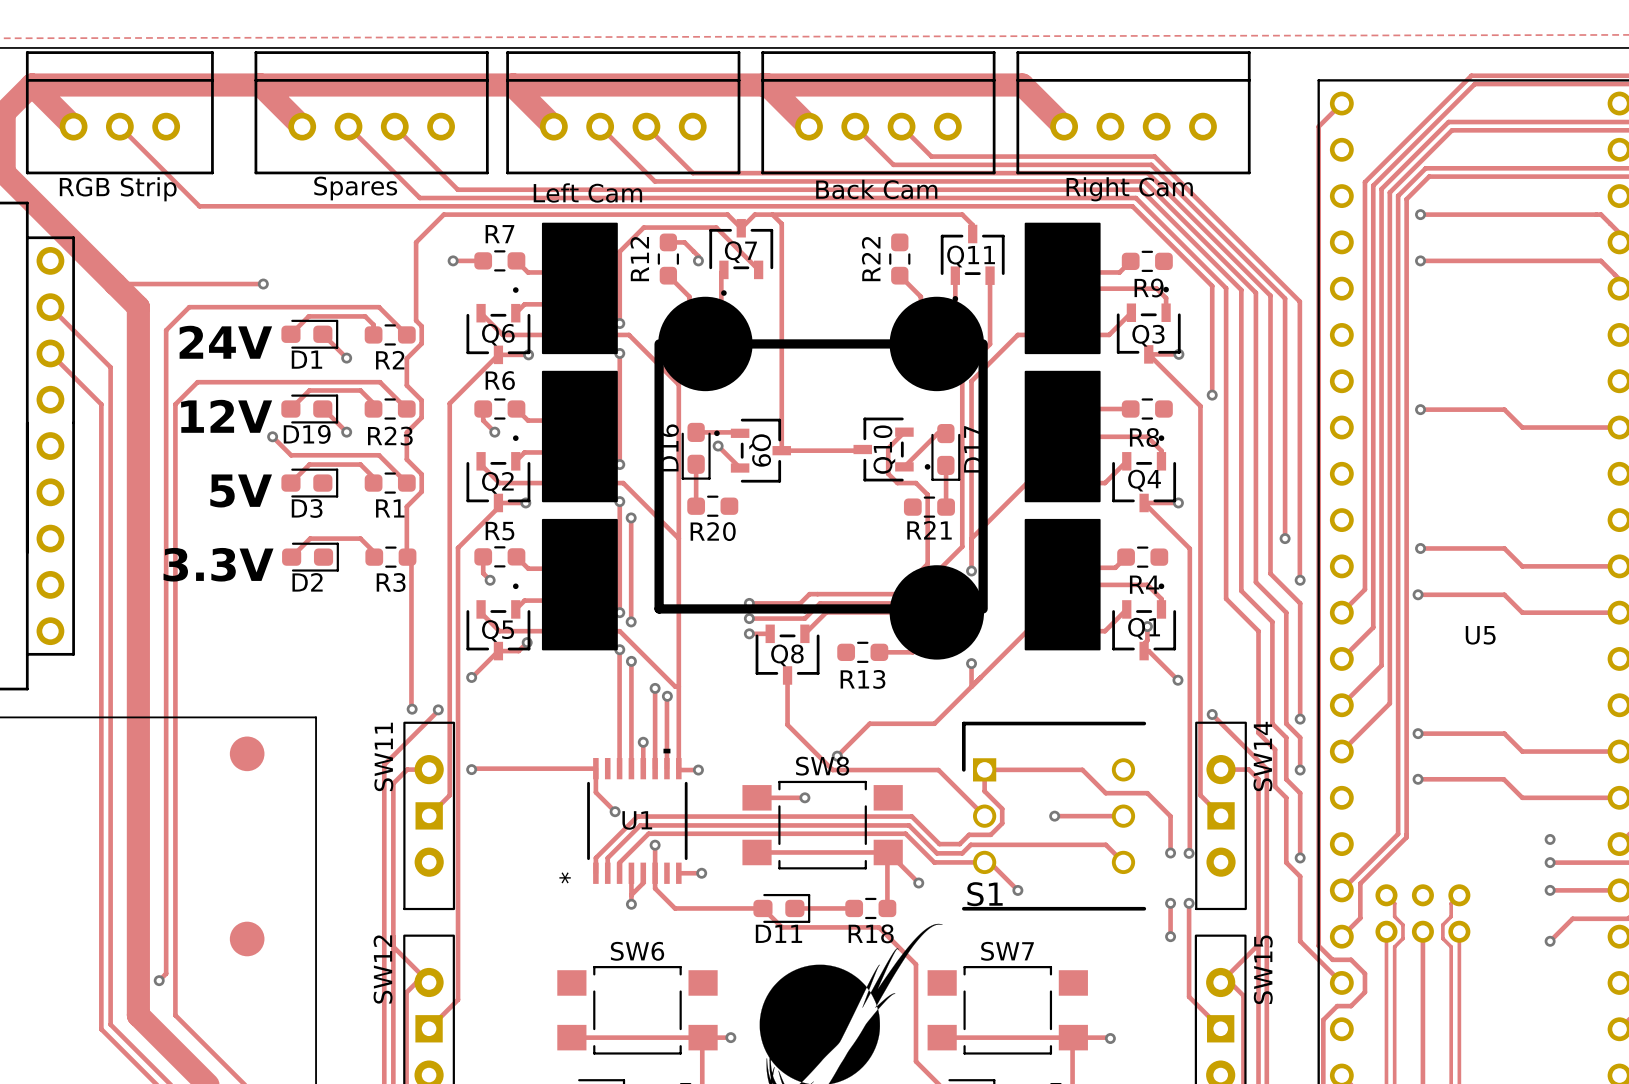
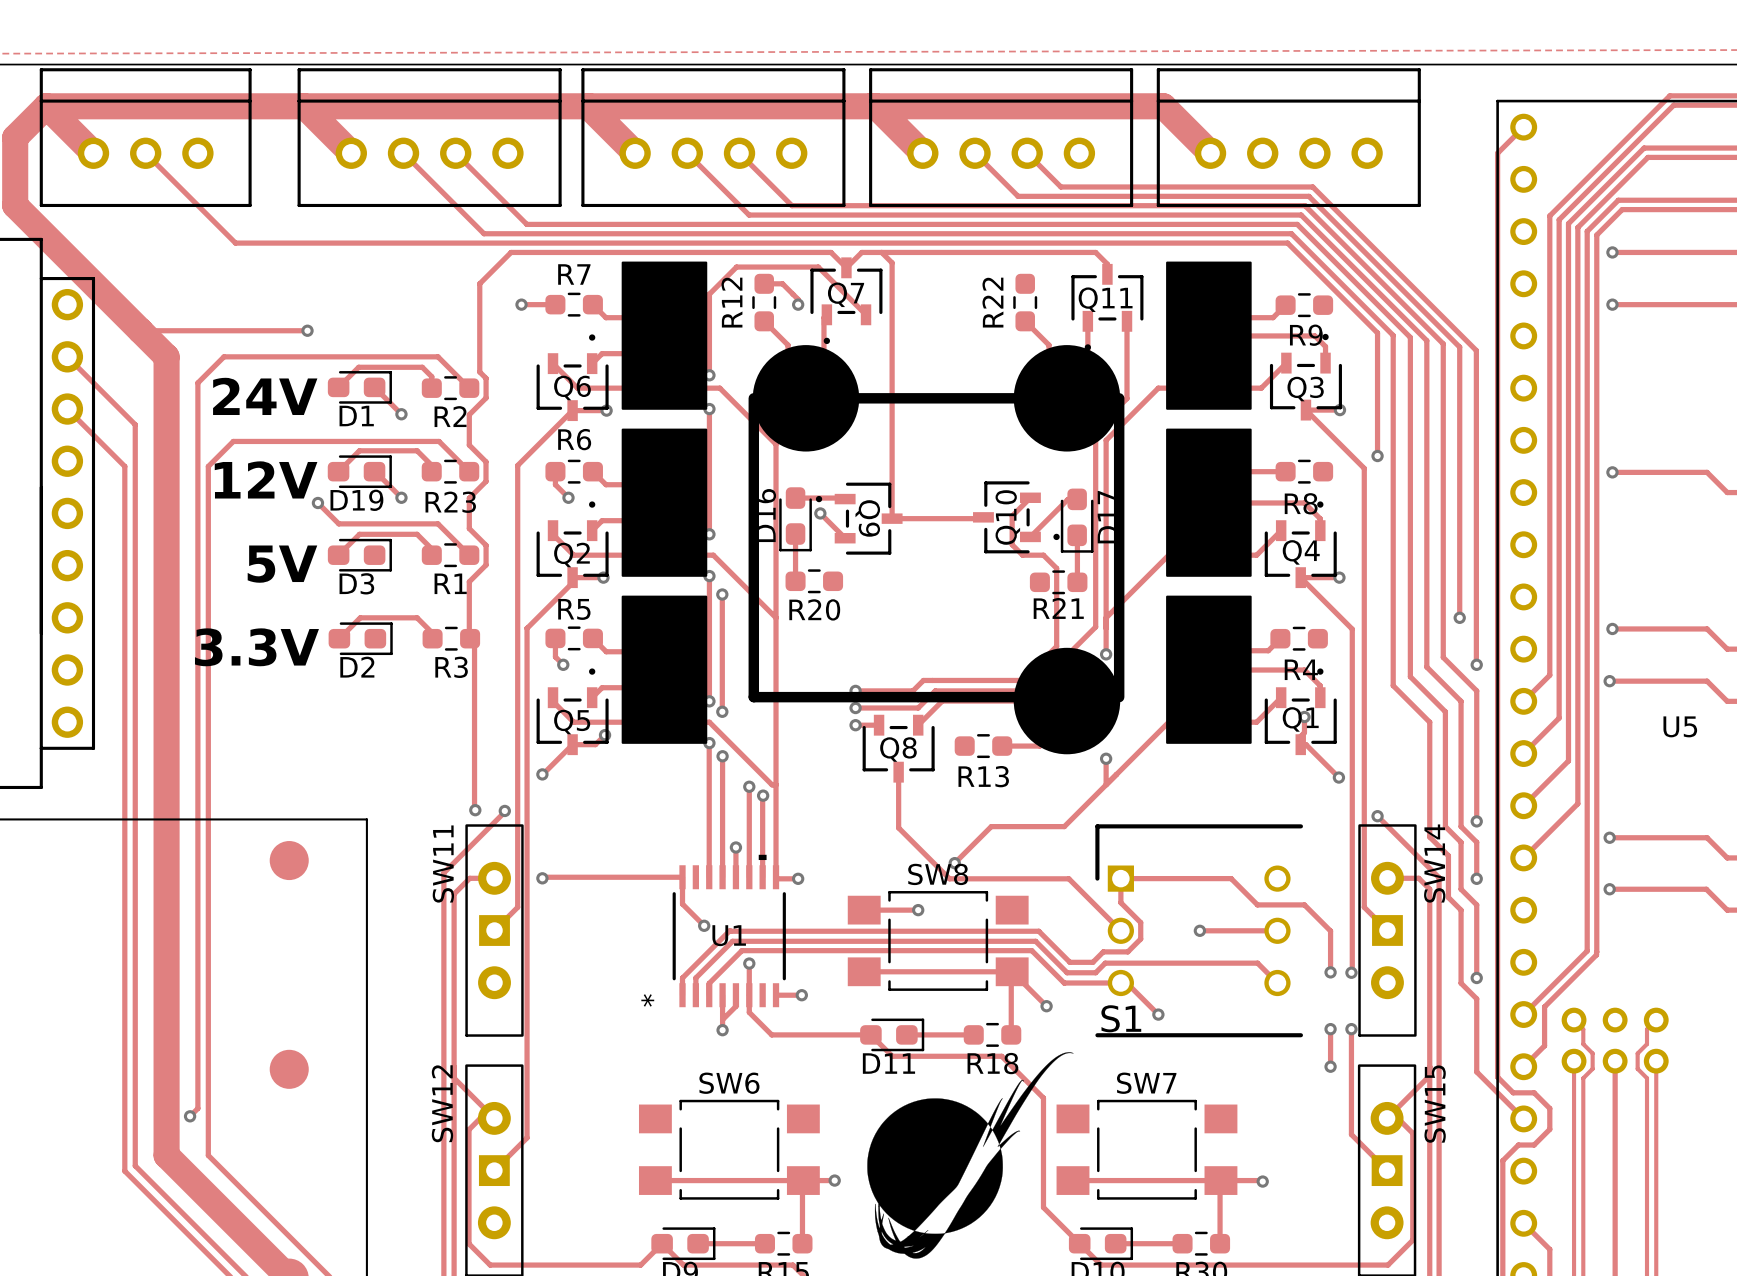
text: Spares (355, 188) -> none
text: RGB Strip (118, 189) -> none
text: Back Cam (876, 189) -> none
text: Right Cam (1129, 189) -> none
text: Left Cam (587, 192) -> none

